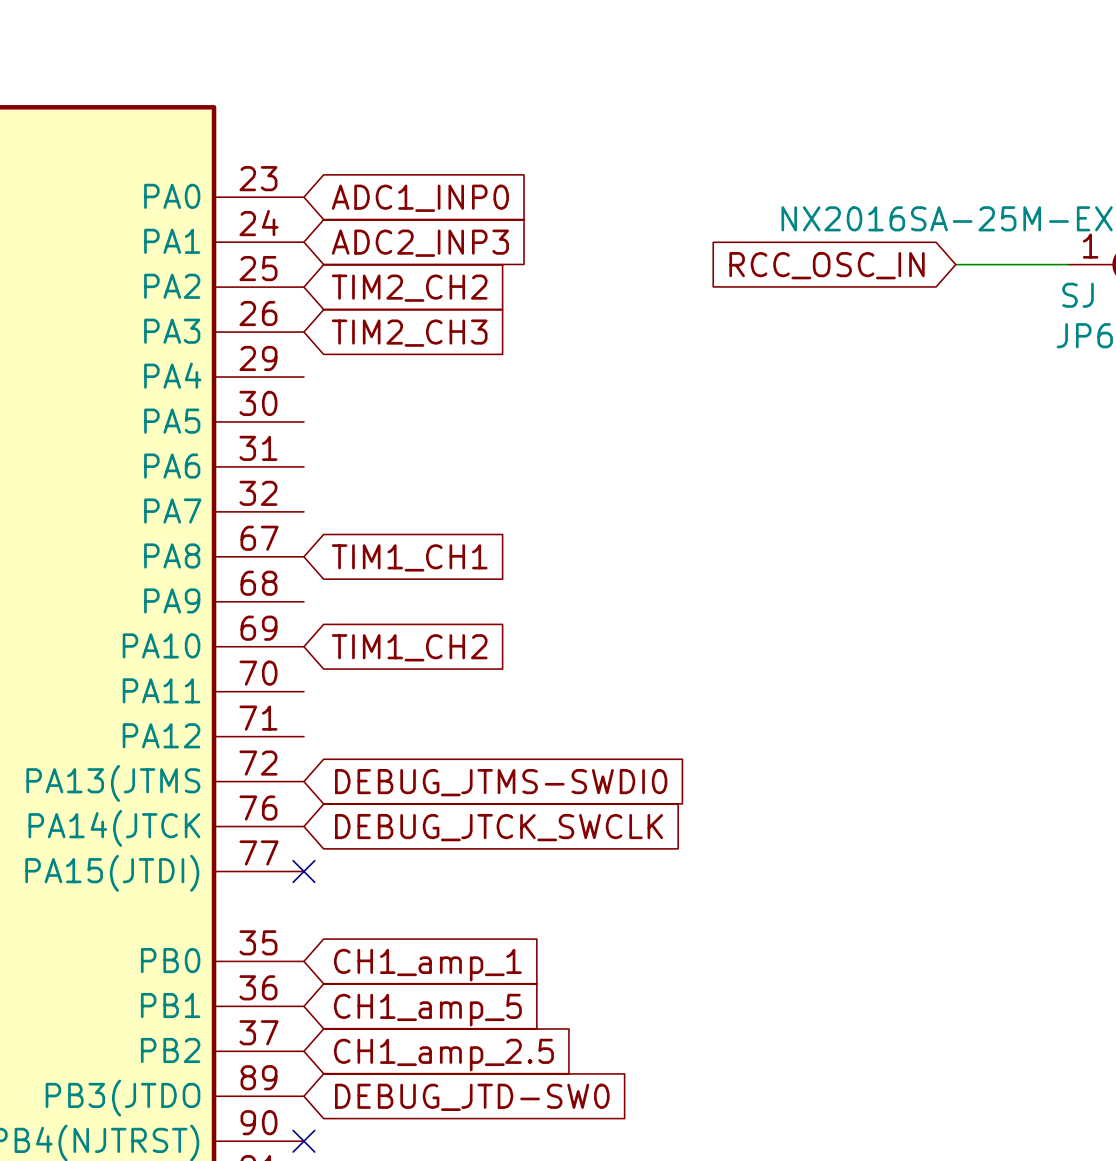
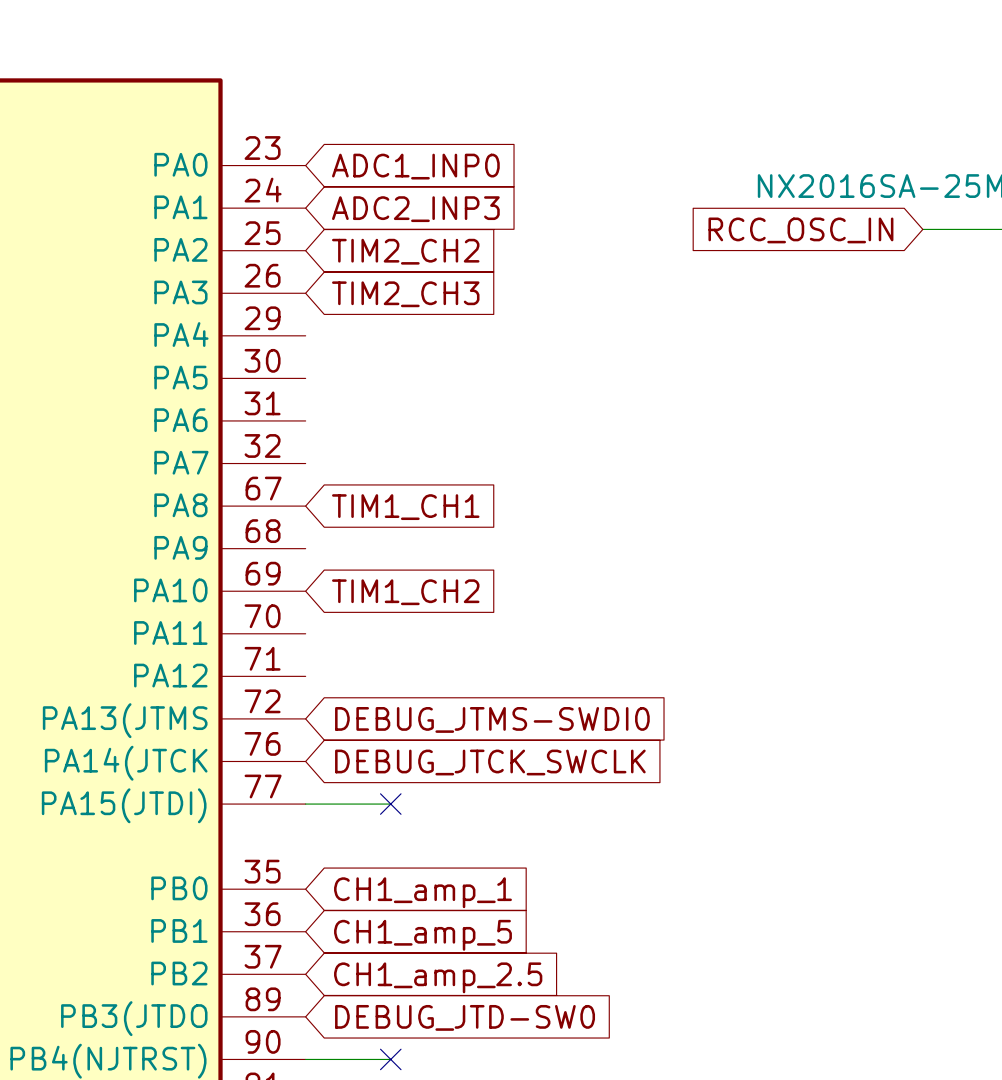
wire: none -> (305, 804) (390, 804)
no-connect mark position: (303, 871) -> (390, 804)
wire: none -> (305, 1059) (390, 1059)
no-connect mark position: (303, 1141) -> (390, 1059)

